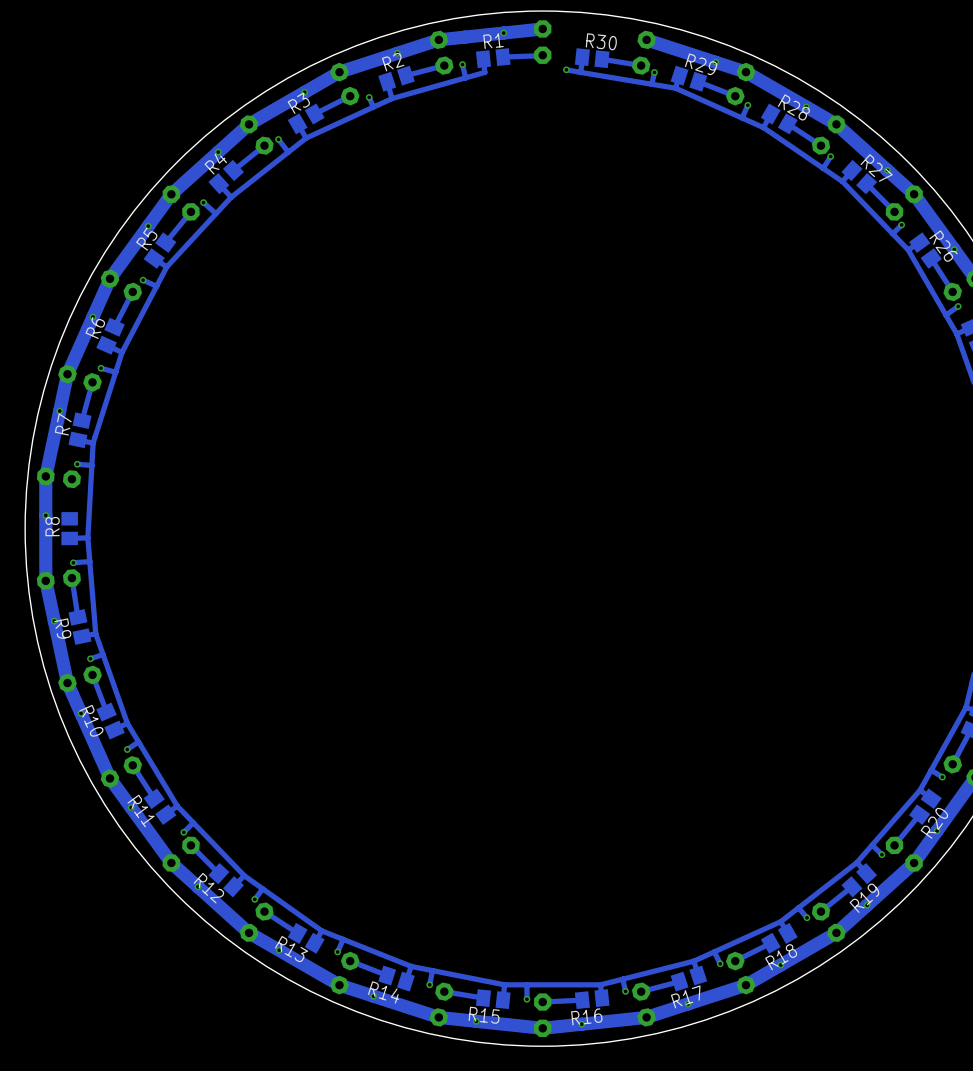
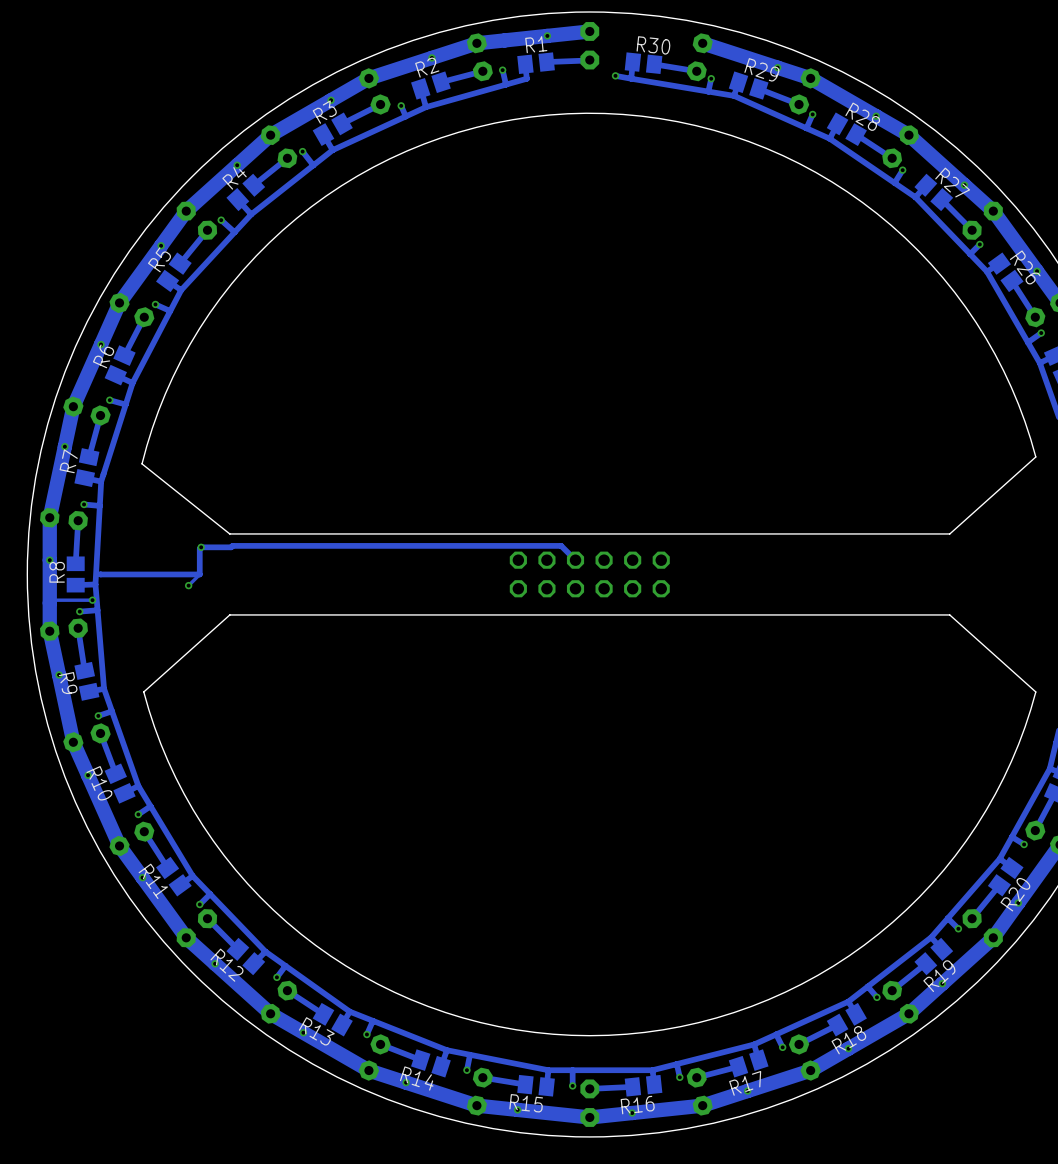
board edge: none -> (1035, 456) (949, 533) (229, 533) (142, 463) (165, 393) (199, 328) (220, 298) (256, 255) (311, 206) (373, 167) (441, 137) (512, 119) (586, 113) (641, 116) (677, 121) (749, 141) (816, 172) (877, 213) (931, 264) (976, 322) (1011, 387) (1035, 456)
track: none -> (78, 520) (75, 563)
track: none -> (201, 547) (199, 574)
track: none -> (201, 547) (561, 545) (575, 560)
via: none -> (201, 547)
track: none -> (100, 574) (199, 574)
track: none -> (199, 574) (188, 585)
part: none -> (589, 574)
via: none -> (188, 585)
track: none -> (92, 600) (52, 600) (49, 603)
via: none -> (92, 600)
board edge: none -> (949, 614) (1035, 691) (1018, 744) (1003, 777) (976, 825) (955, 855) (919, 897) (878, 934) (833, 965) (801, 984) (768, 999) (716, 1017) (662, 1029) (626, 1034) (589, 1035) (534, 1032) (462, 1017) (394, 992) (361, 975) (315, 945) (273, 910) (247, 883) (202, 825) (168, 761) (143, 691) (229, 614) (949, 614)

